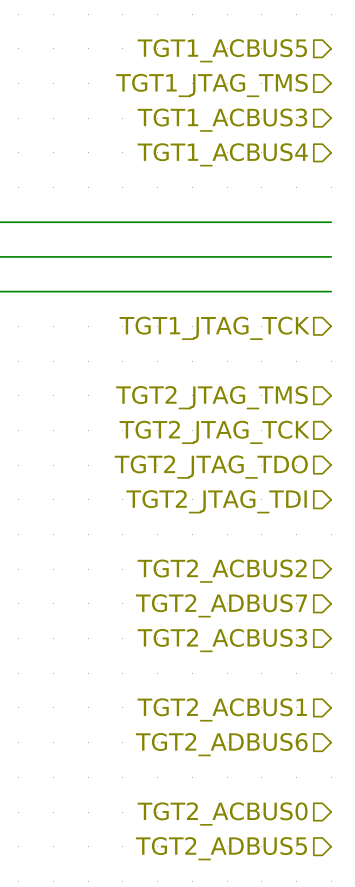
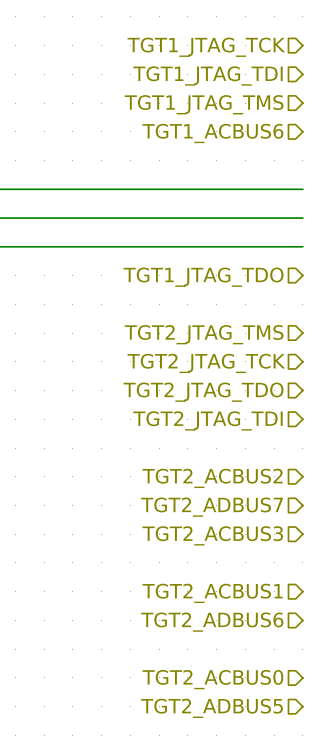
hierarchical label: TGT1_ACBUS5 (222, 50) -> TGT1_JTAG_TCK (206, 47)
hierarchical label: TGT1_JTAG_TMS (211, 85) -> TGT1_JTAG_TDI (207, 75)
hierarchical label: TGT1_ACBUS3 (222, 120) -> TGT1_JTAG_TMS (204, 104)
hierarchical label: TGT1_ACBUS4 (222, 154) -> TGT1_ACBUS6 (212, 133)
hierarchical label: TGT1_JTAG_TCK (214, 328) -> TGT1_JTAG_TDO (203, 277)

